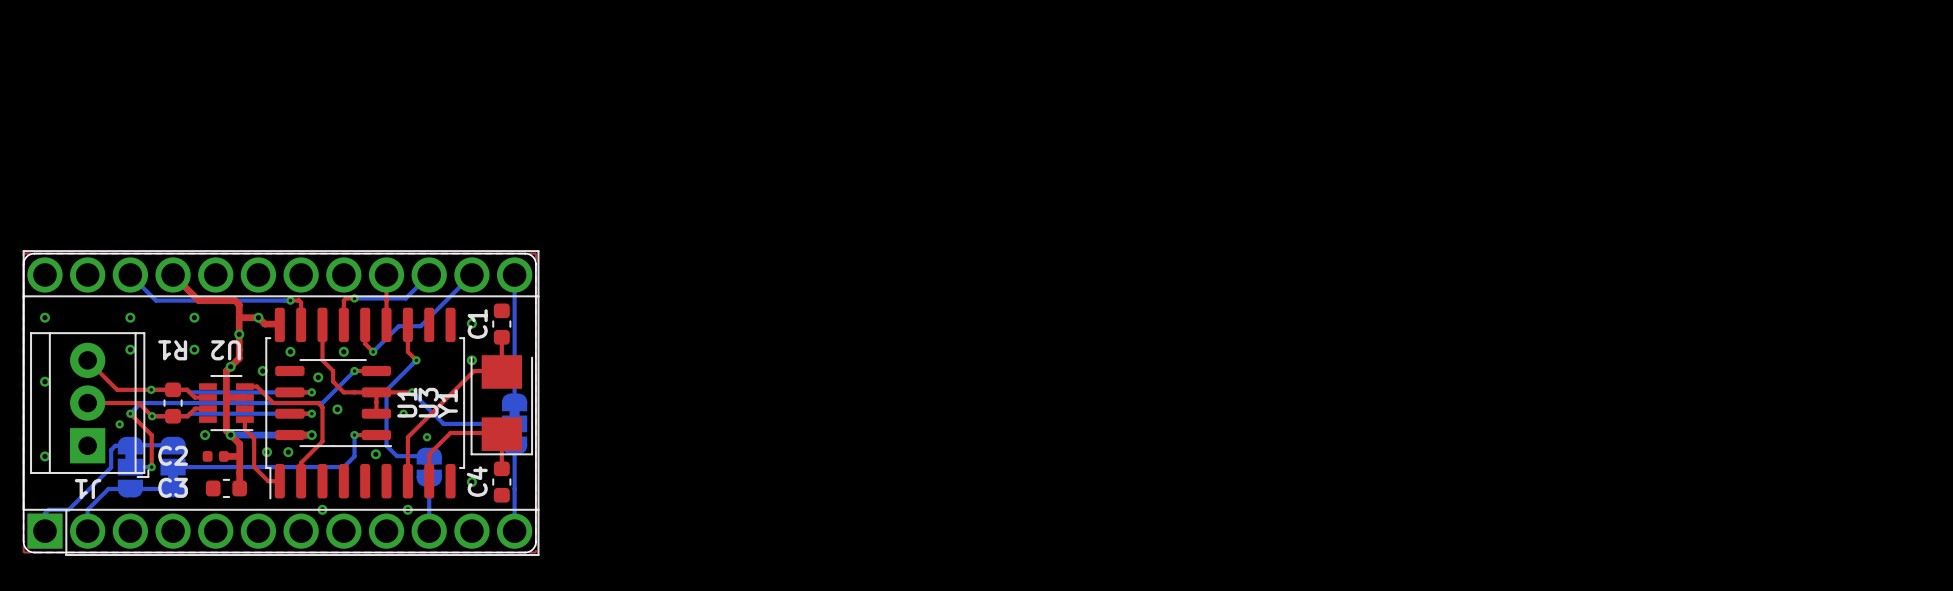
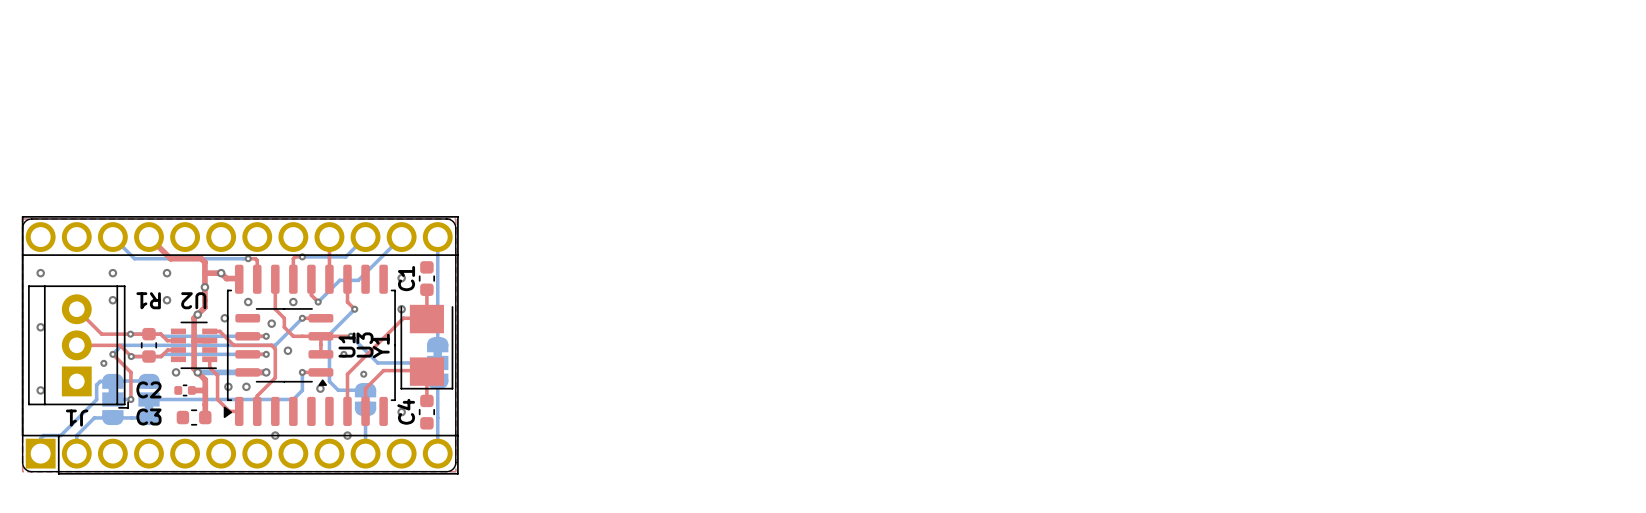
U3 footprint: [265, 307, 466, 500] -> [223, 264, 396, 426]
U1 footprint: [275, 359, 393, 448] -> [235, 308, 334, 386]
C2 footprint: [202, 451, 229, 462] -> [174, 384, 196, 397]

